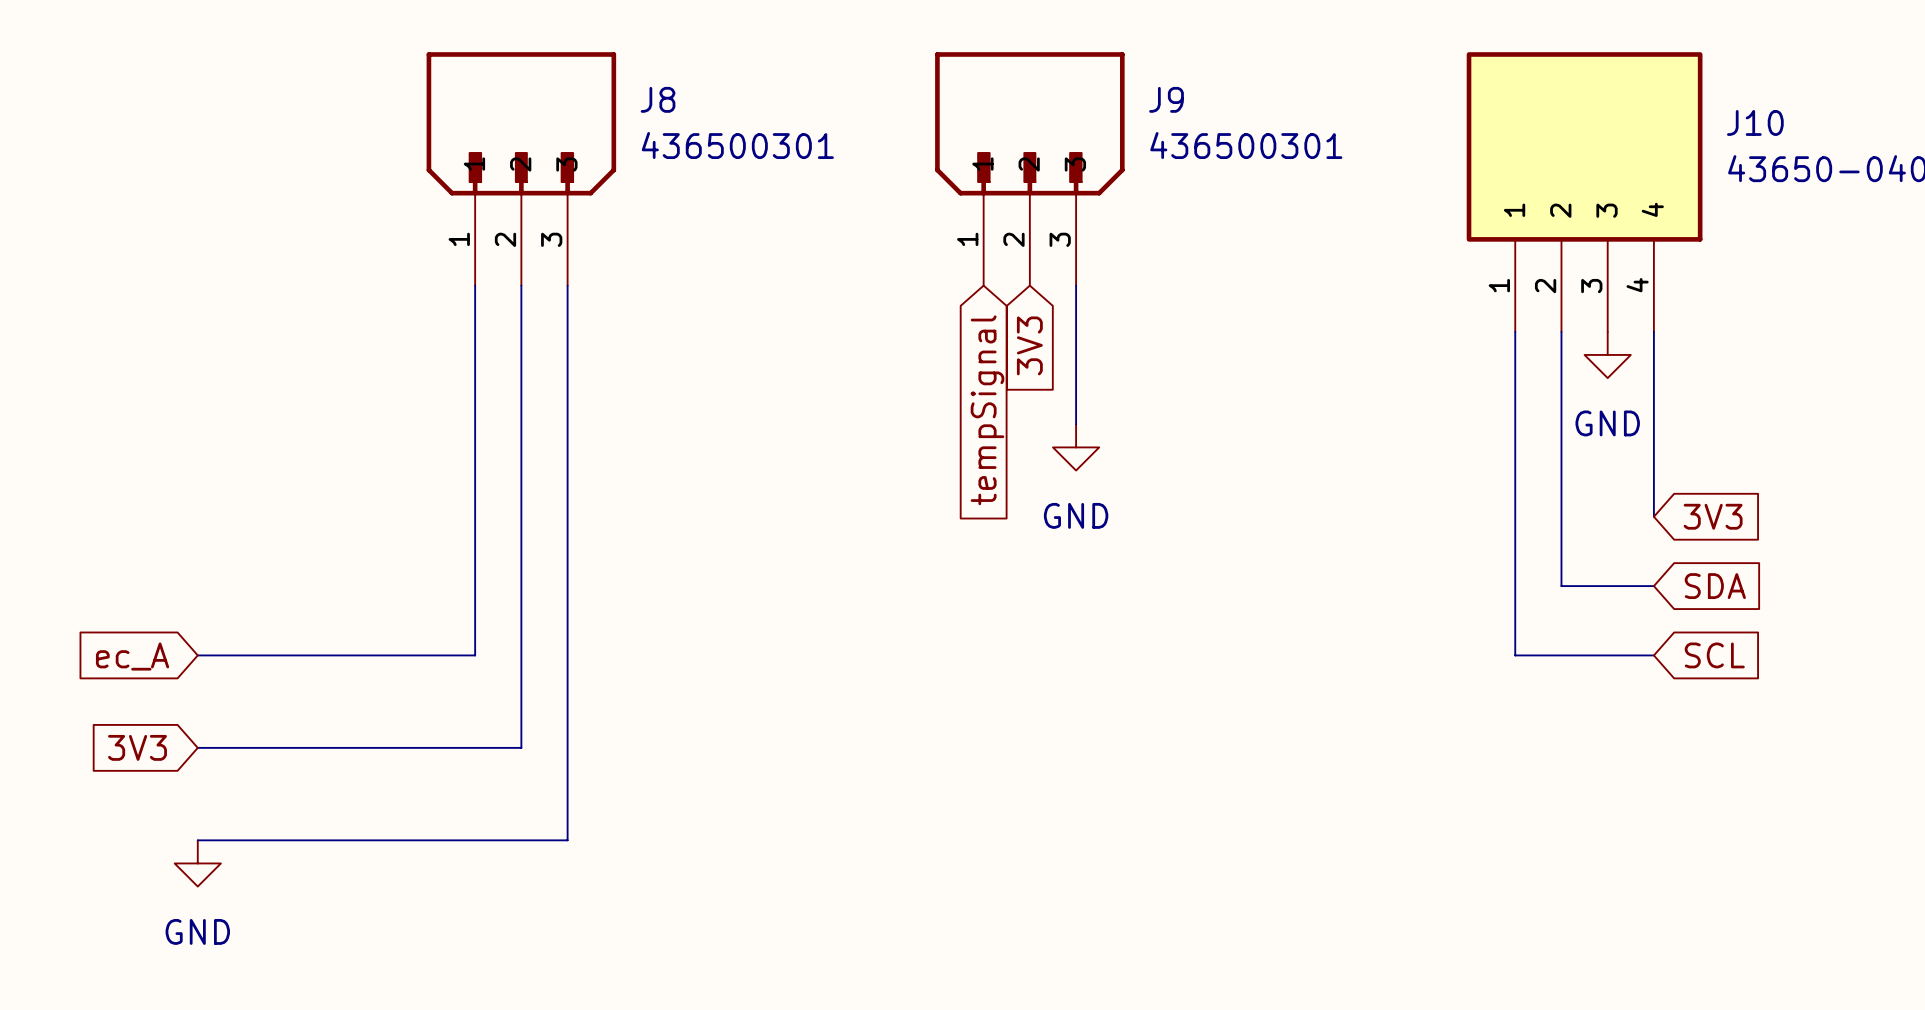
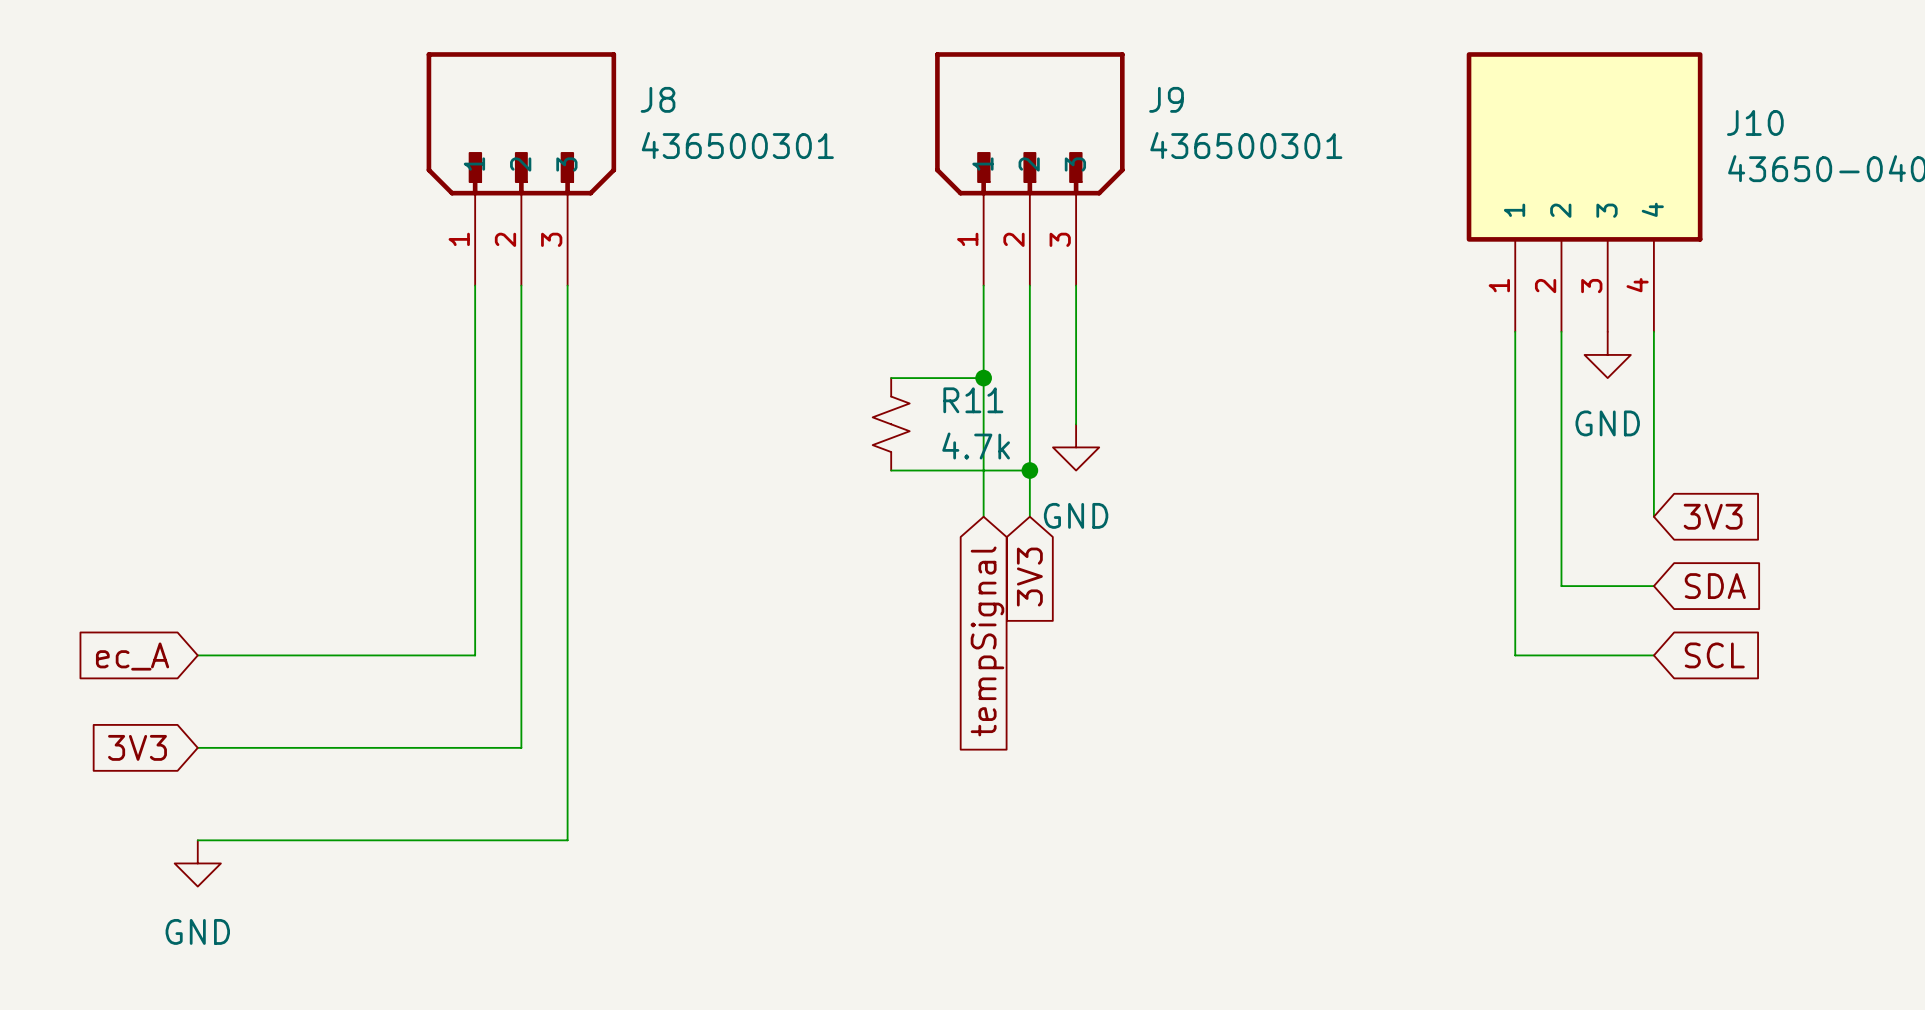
wire: none -> (983, 285) (983, 516)
wire: none -> (1029, 285) (1029, 516)
global label position: 3V3 (1029, 345) -> 3V3 (1029, 577)
wire: none -> (891, 378) (983, 378)
junction: none -> (983, 378)
global label position: tempSignal (987, 410) -> tempSignal (987, 641)
R11: none -> 4.7k (891, 424)
wire: none -> (891, 470) (1029, 470)
junction: none -> (1029, 470)

